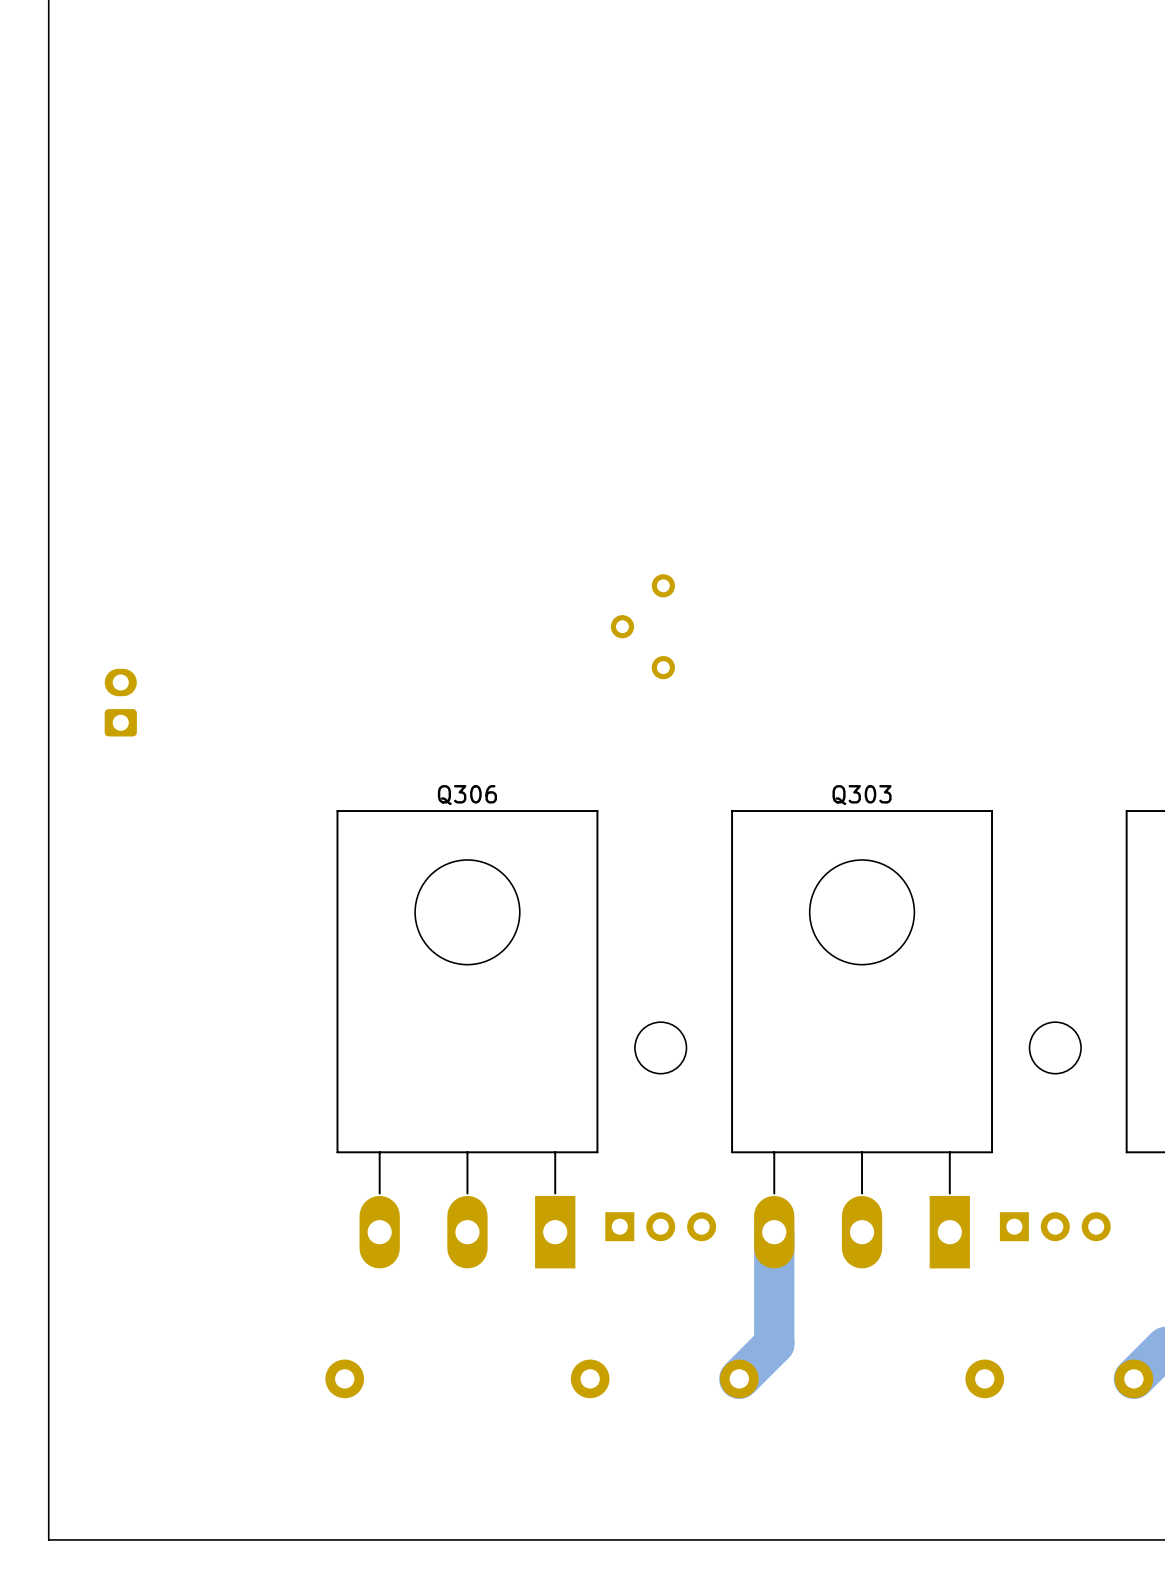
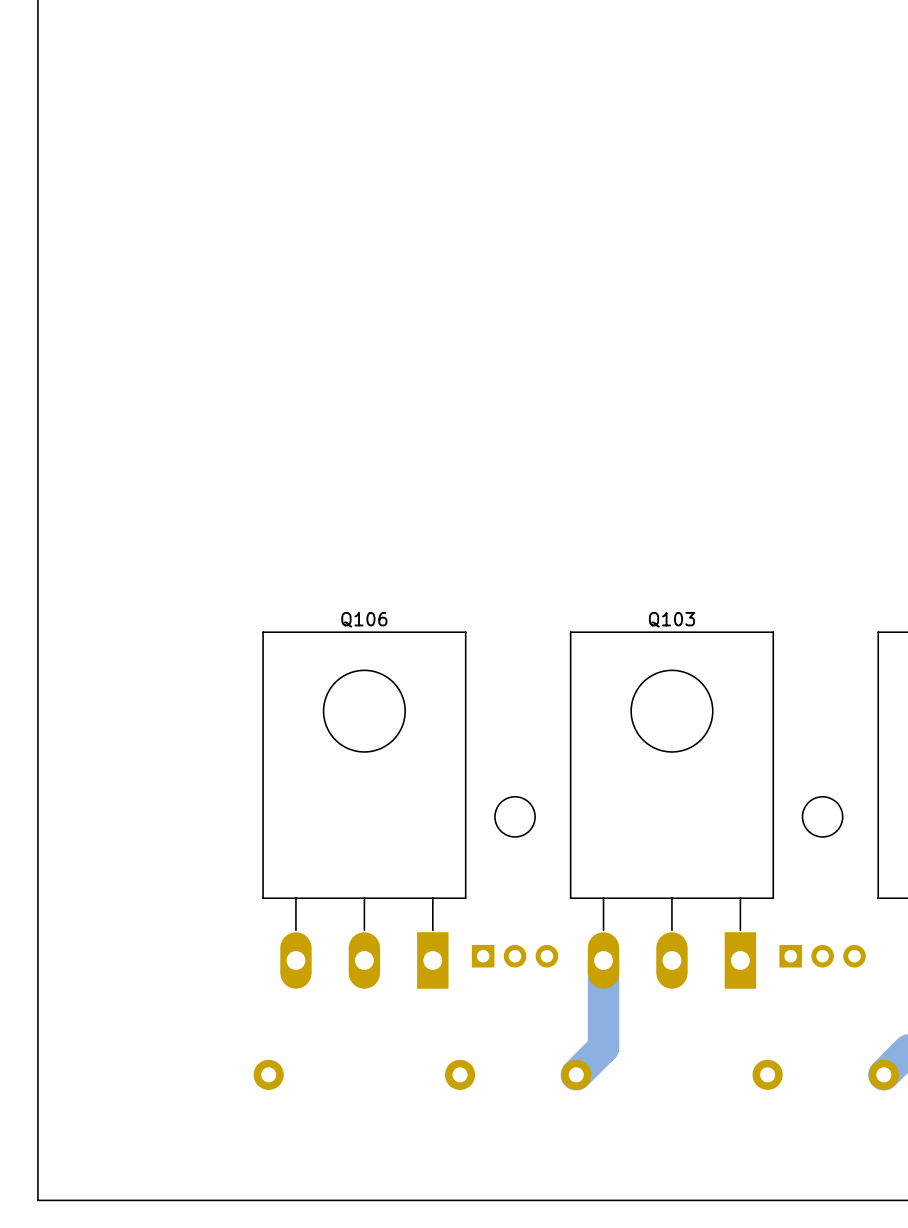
part: (642, 626) -> none
part: (120, 702) -> none
Q306 name: Q306 (467, 795) -> Q106 (364, 619)
Q303 name: Q303 (862, 795) -> Q103 (671, 619)

